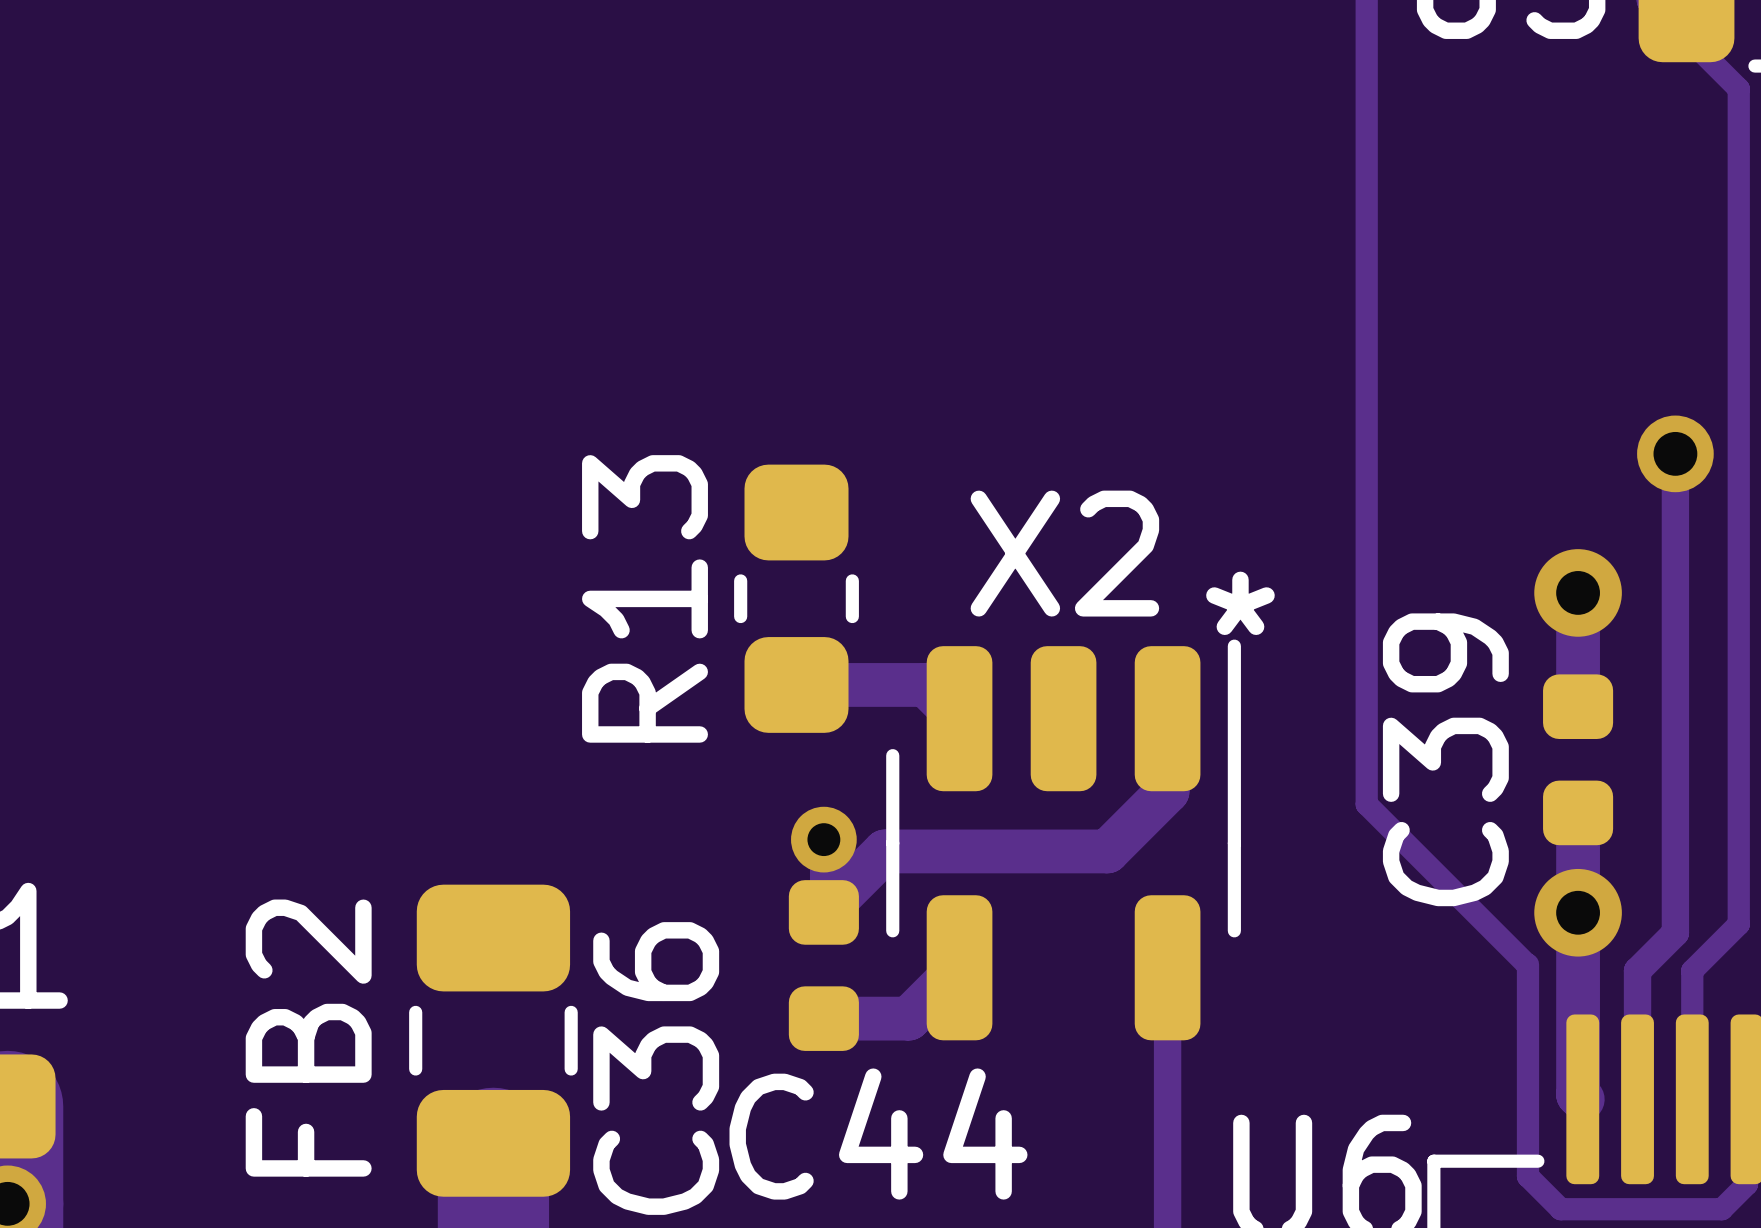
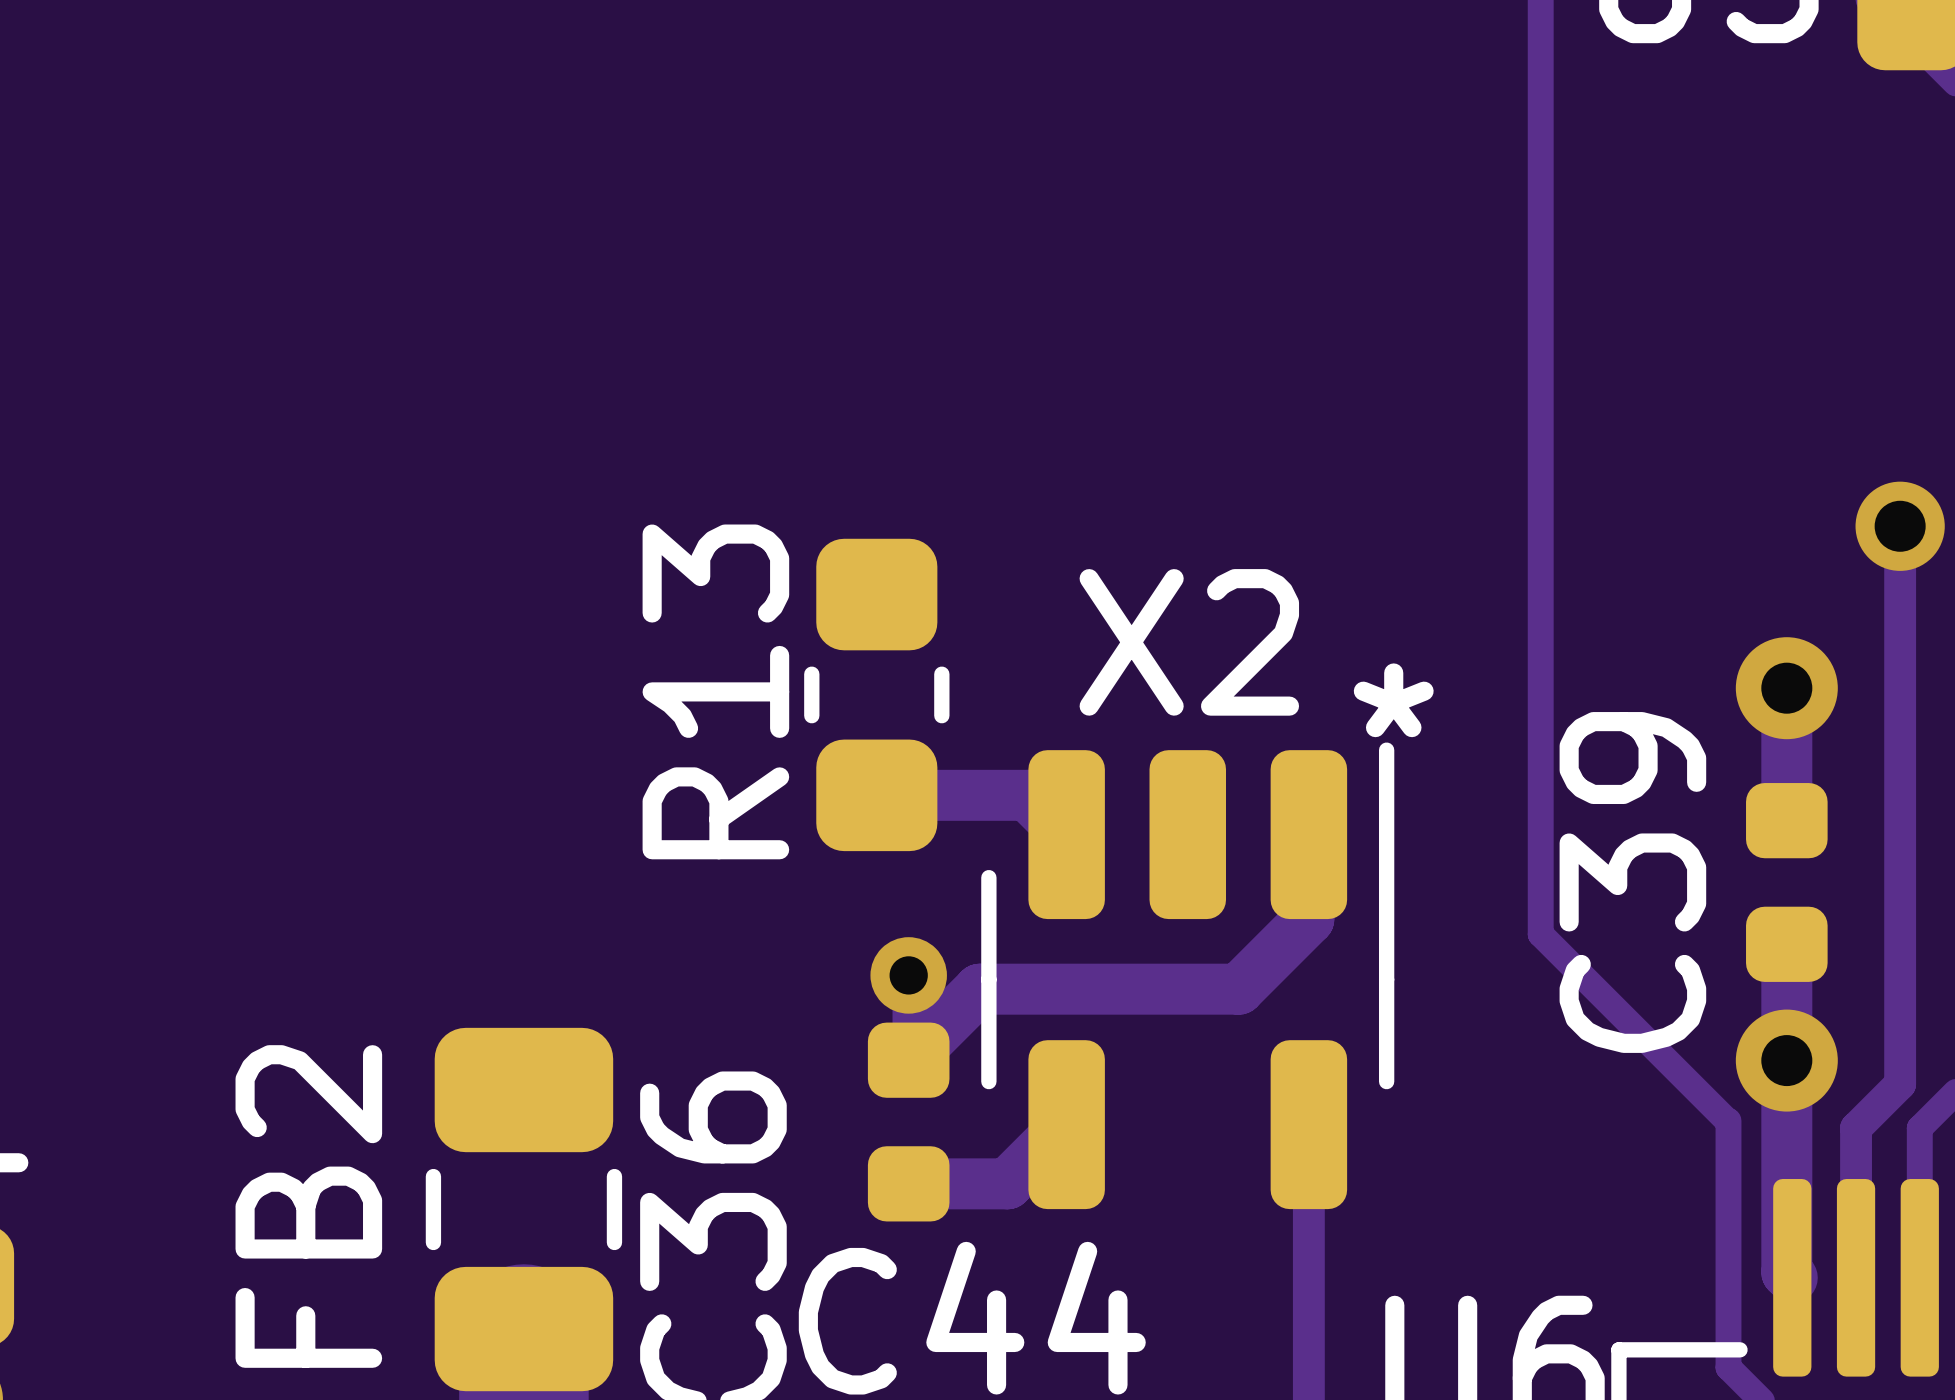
R13 name position: R13 (644, 598) -> R13 (715, 691)

